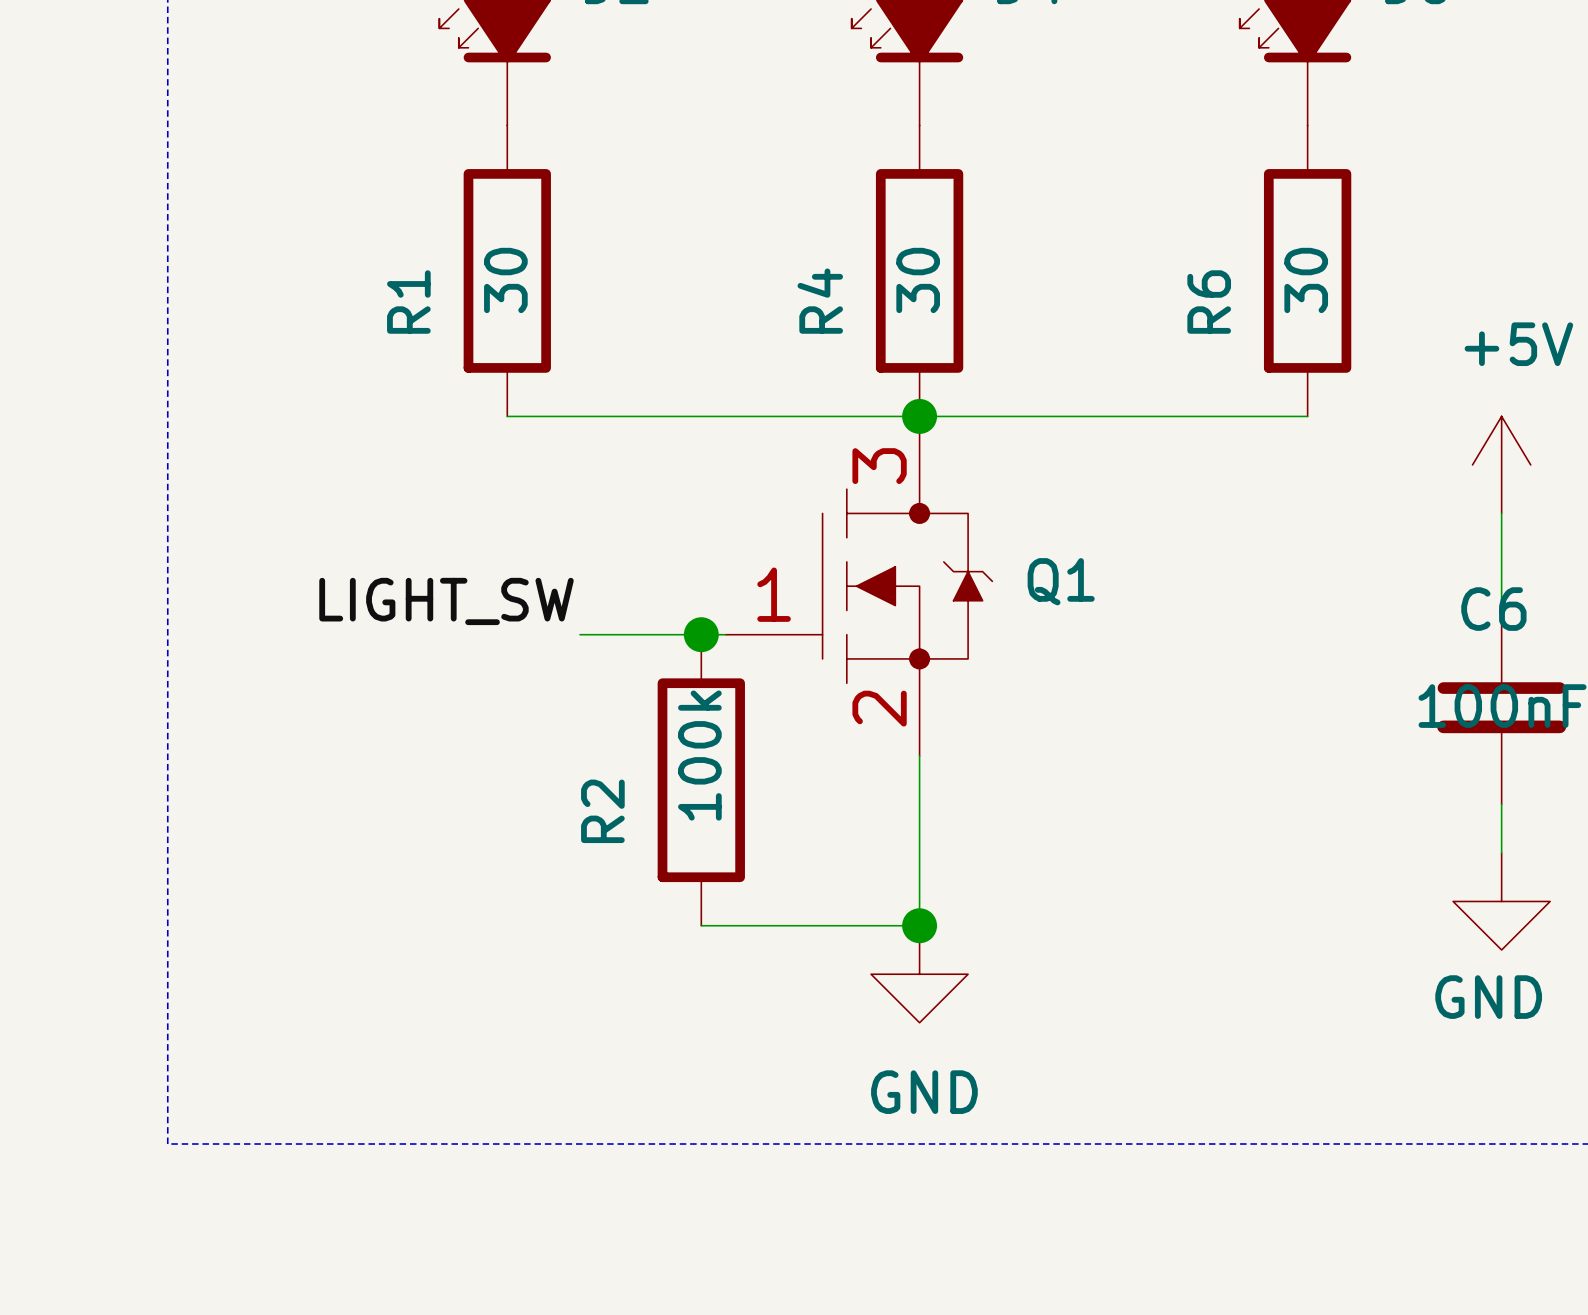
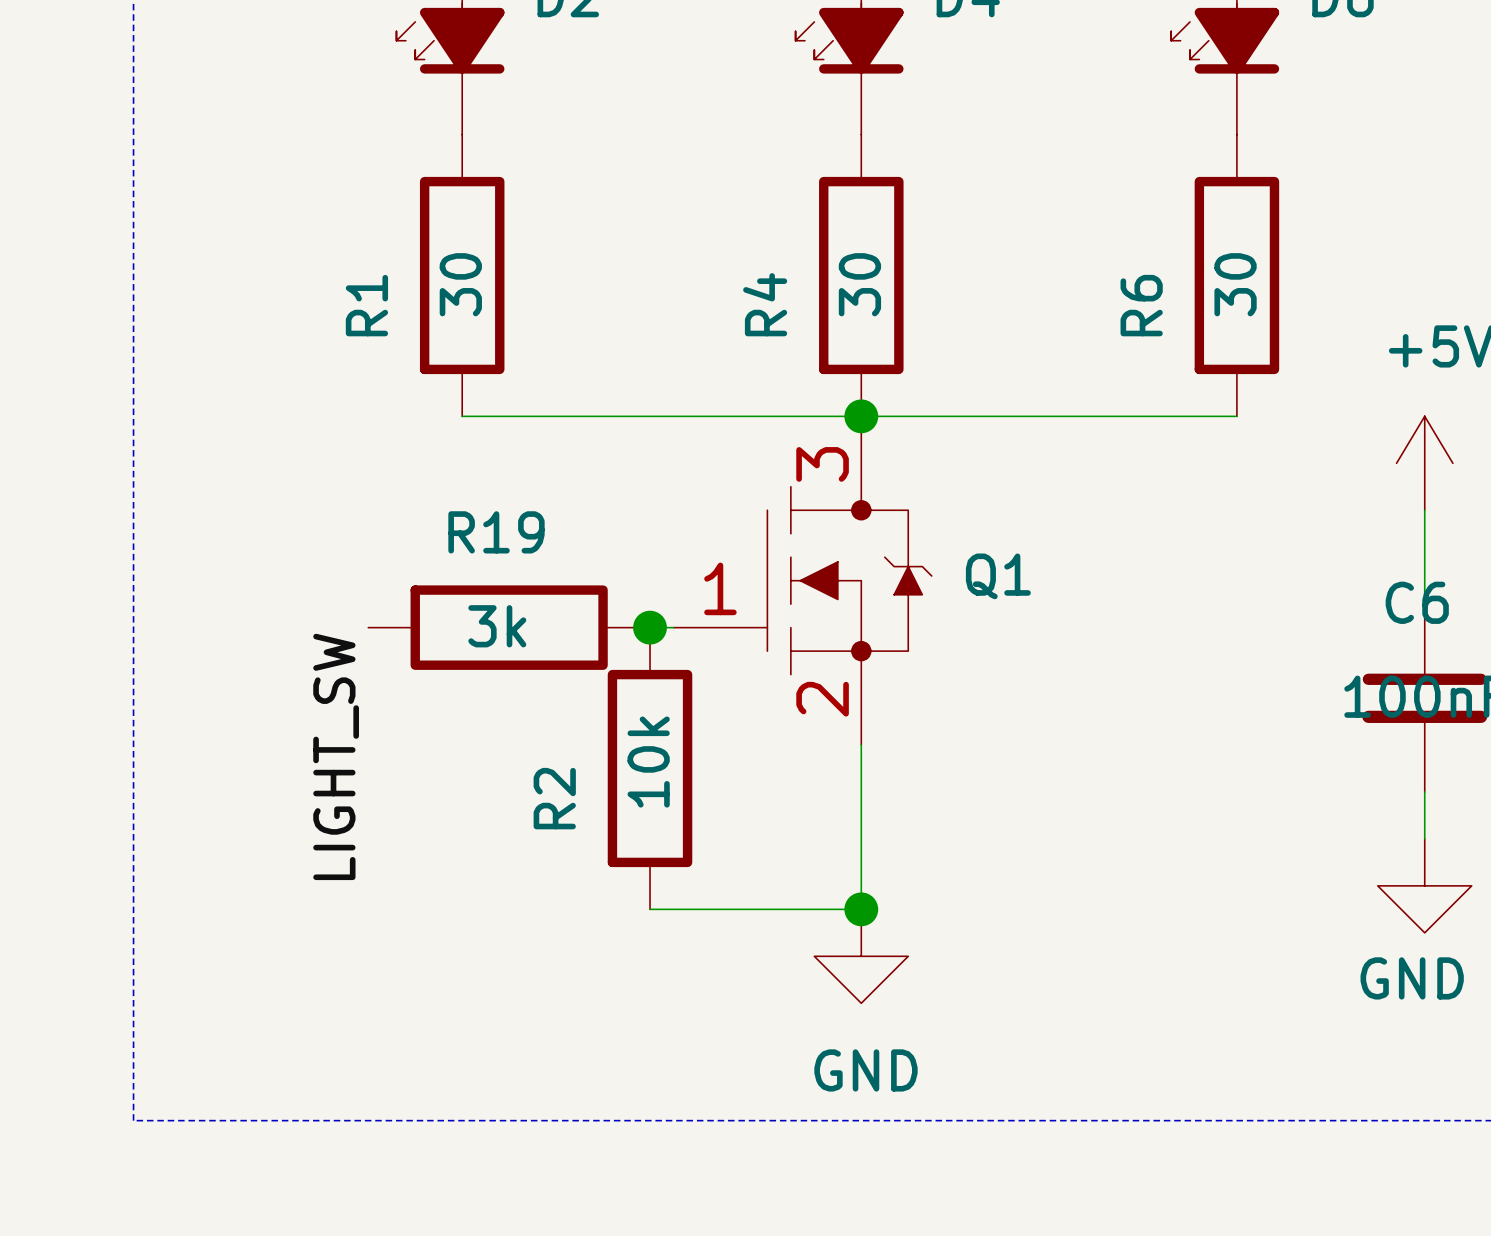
label rotation: 0° (446, 601) -> 90° counterclockwise (336, 756)
R19: none -> (509, 627)
wire: (580, 634) (701, 634) -> none
R2 text: 100k (699, 755) -> 10k (648, 762)

